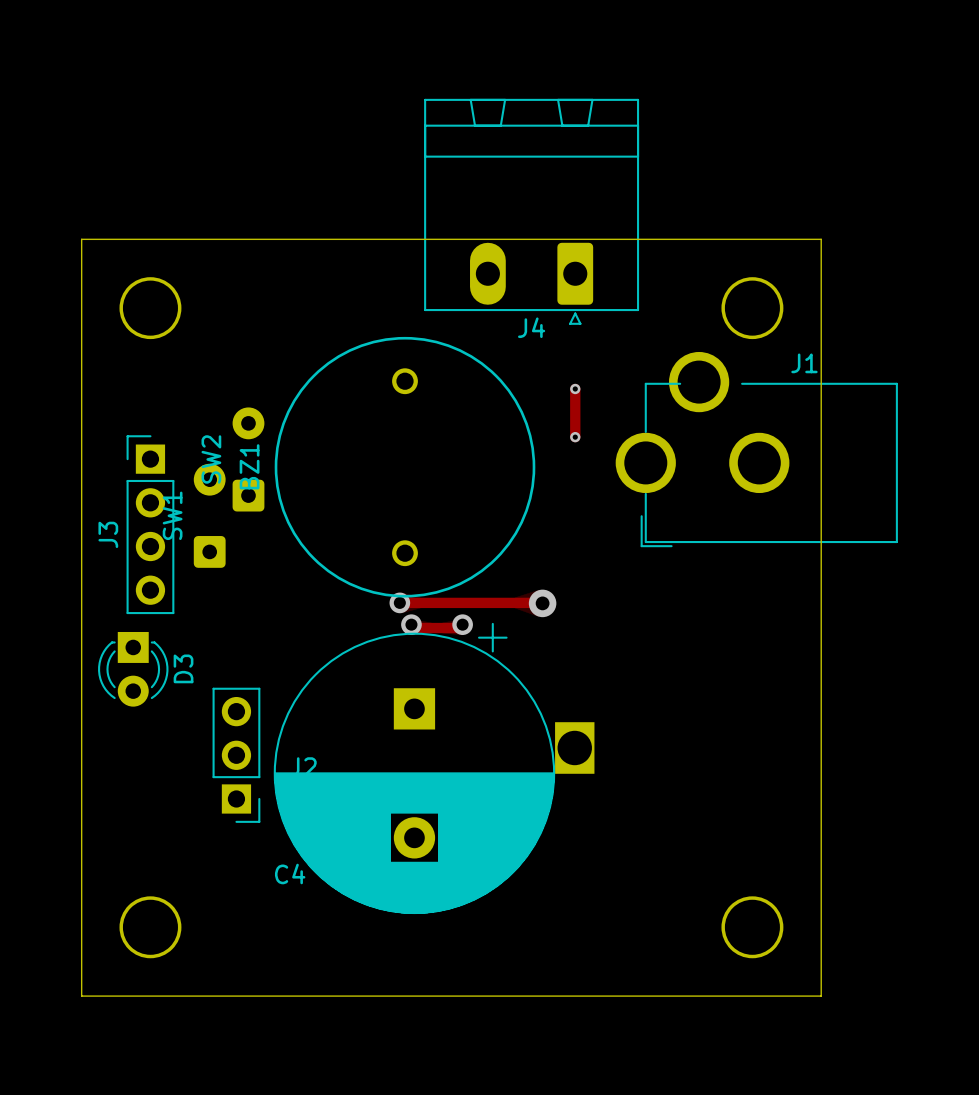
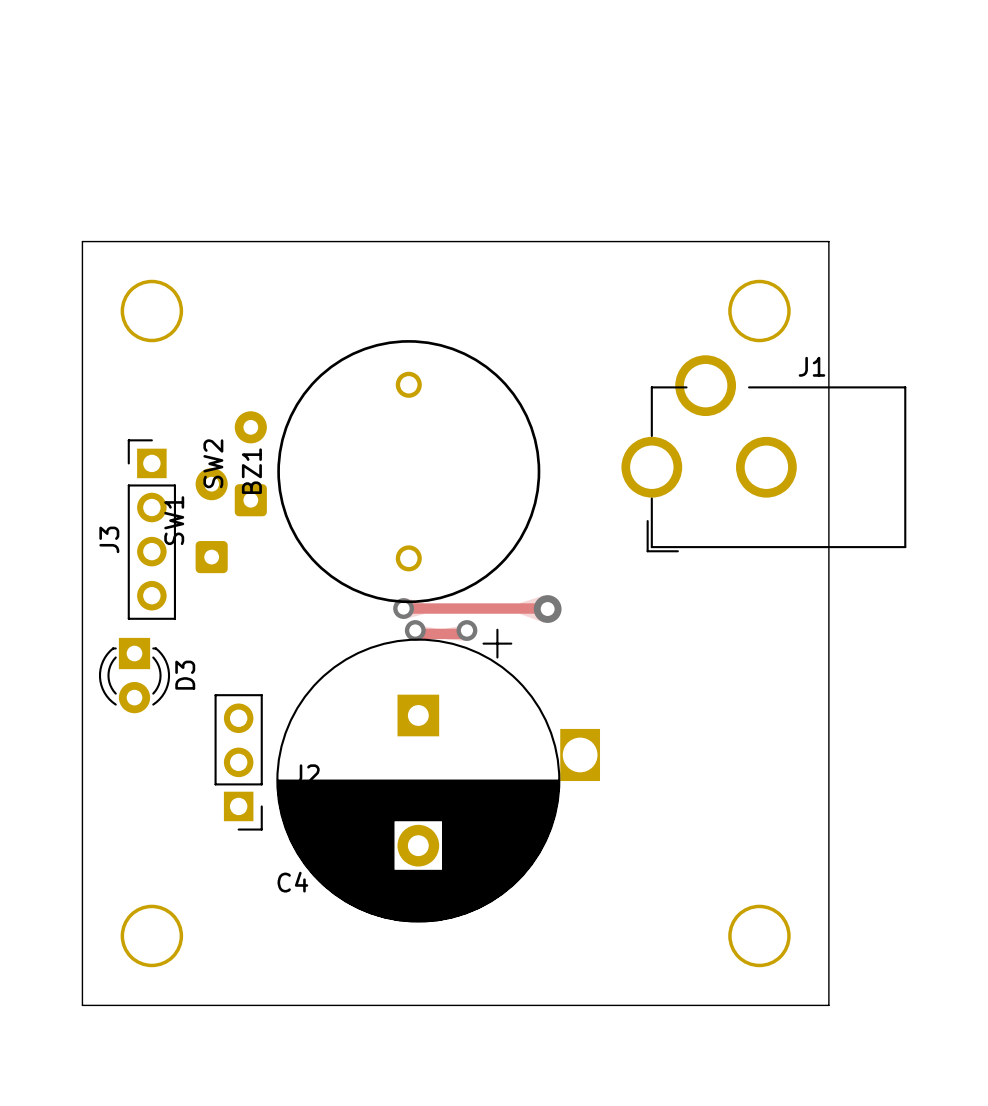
J4: (531, 211) -> none
track: (575, 388) (575, 437) -> none
via: (575, 388) -> none
via: (575, 437) -> none

